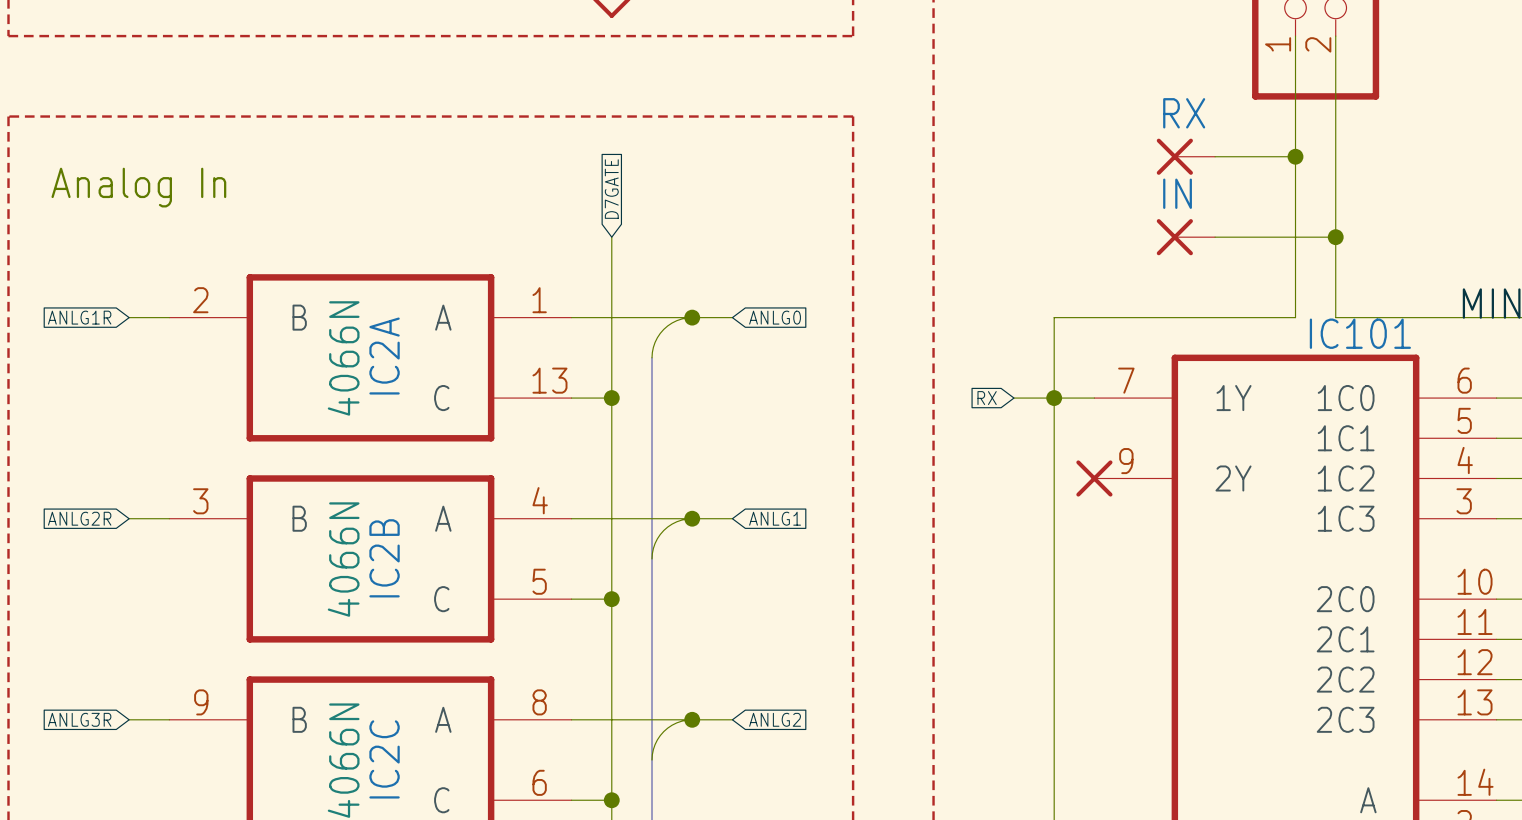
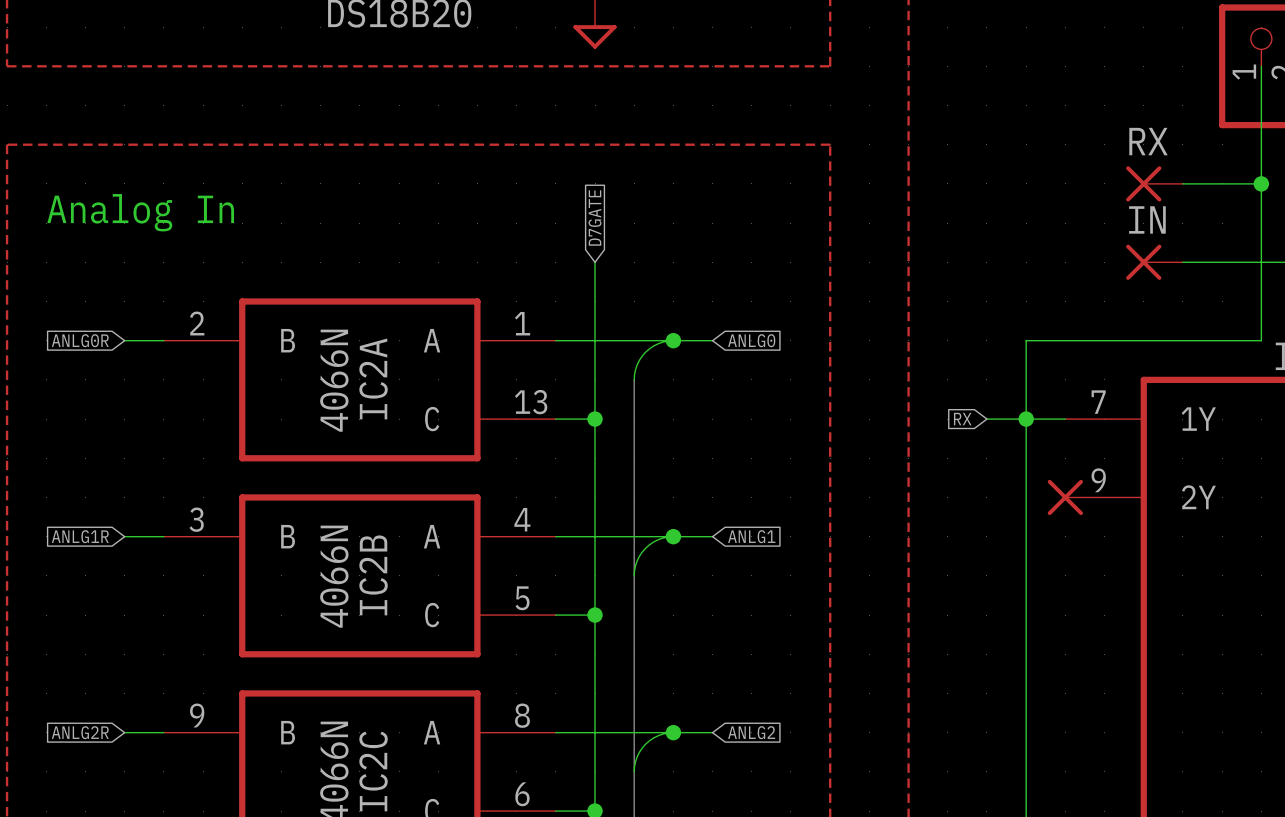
global label: ANLG1R (79, 317) -> ANLG0R (80, 340)
global label: ANLG2R (79, 518) -> ANLG1R (80, 536)
global label: ANLG3R (79, 719) -> ANLG2R (80, 732)

